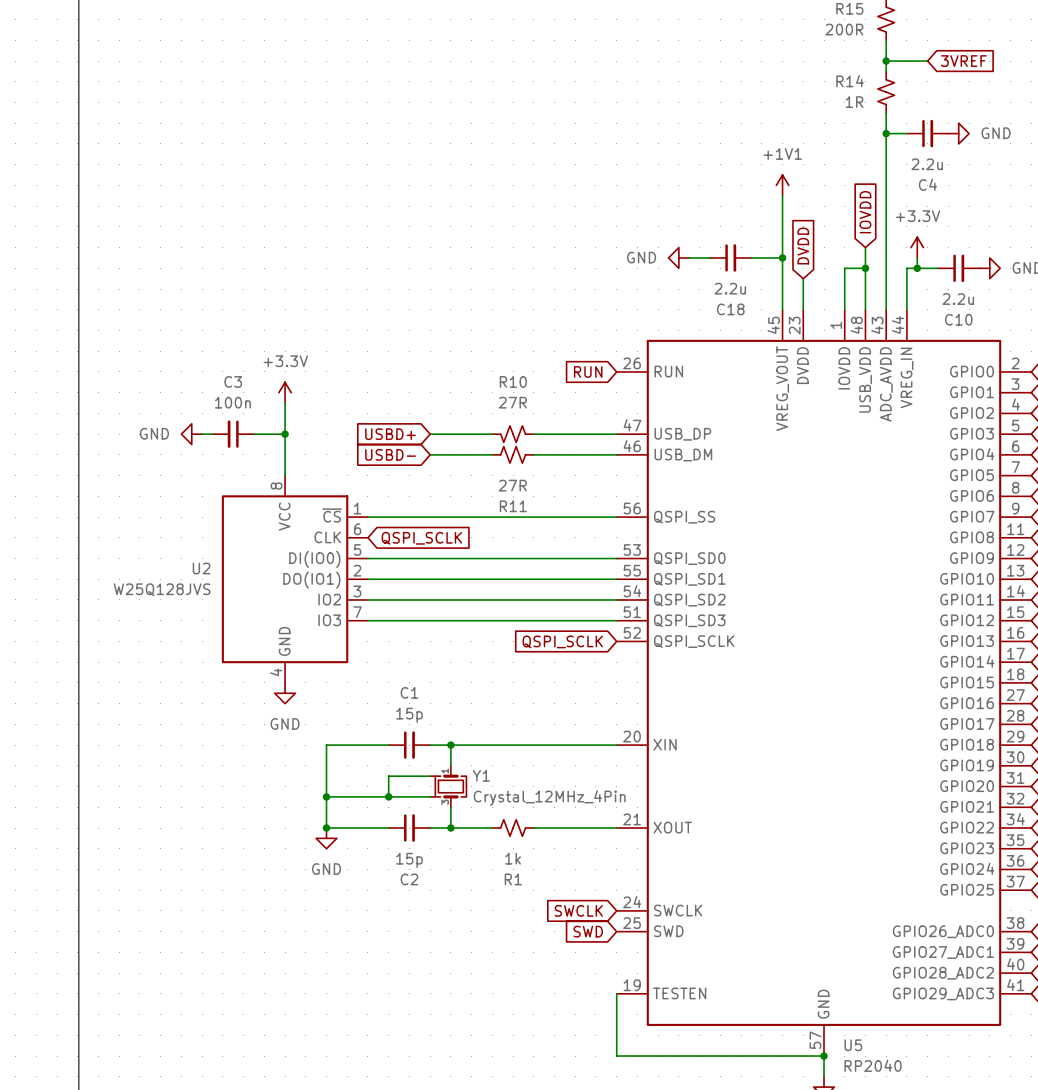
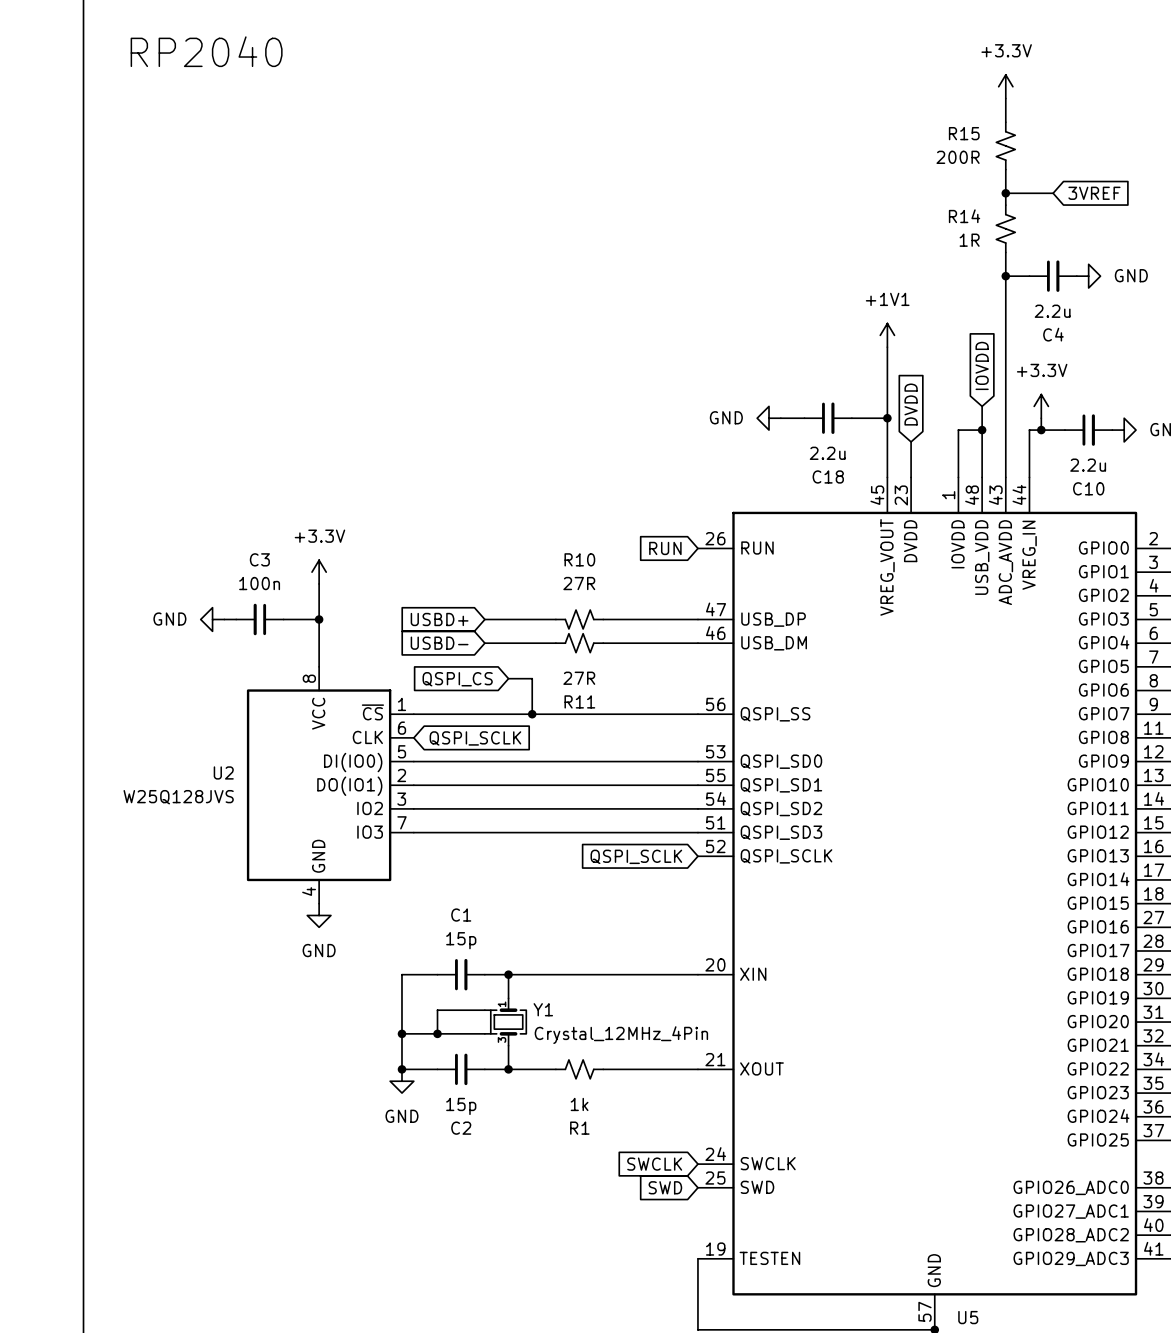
wire: none -> (508, 678) (532, 678) (532, 714)
global label: none -> QSPI_CS (457, 679)
junction: none -> (532, 714)
wire: (357, 745) (326, 745) (326, 828) (357, 828) -> (401, 974) (401, 1069)
wire: (326, 796) (357, 796) -> none
junction: (326, 796) -> none
junction: none -> (401, 1033)
junction: (326, 828) -> none
junction: none -> (401, 1069)
power symbol position: GND (326, 838) -> GND (401, 1081)

